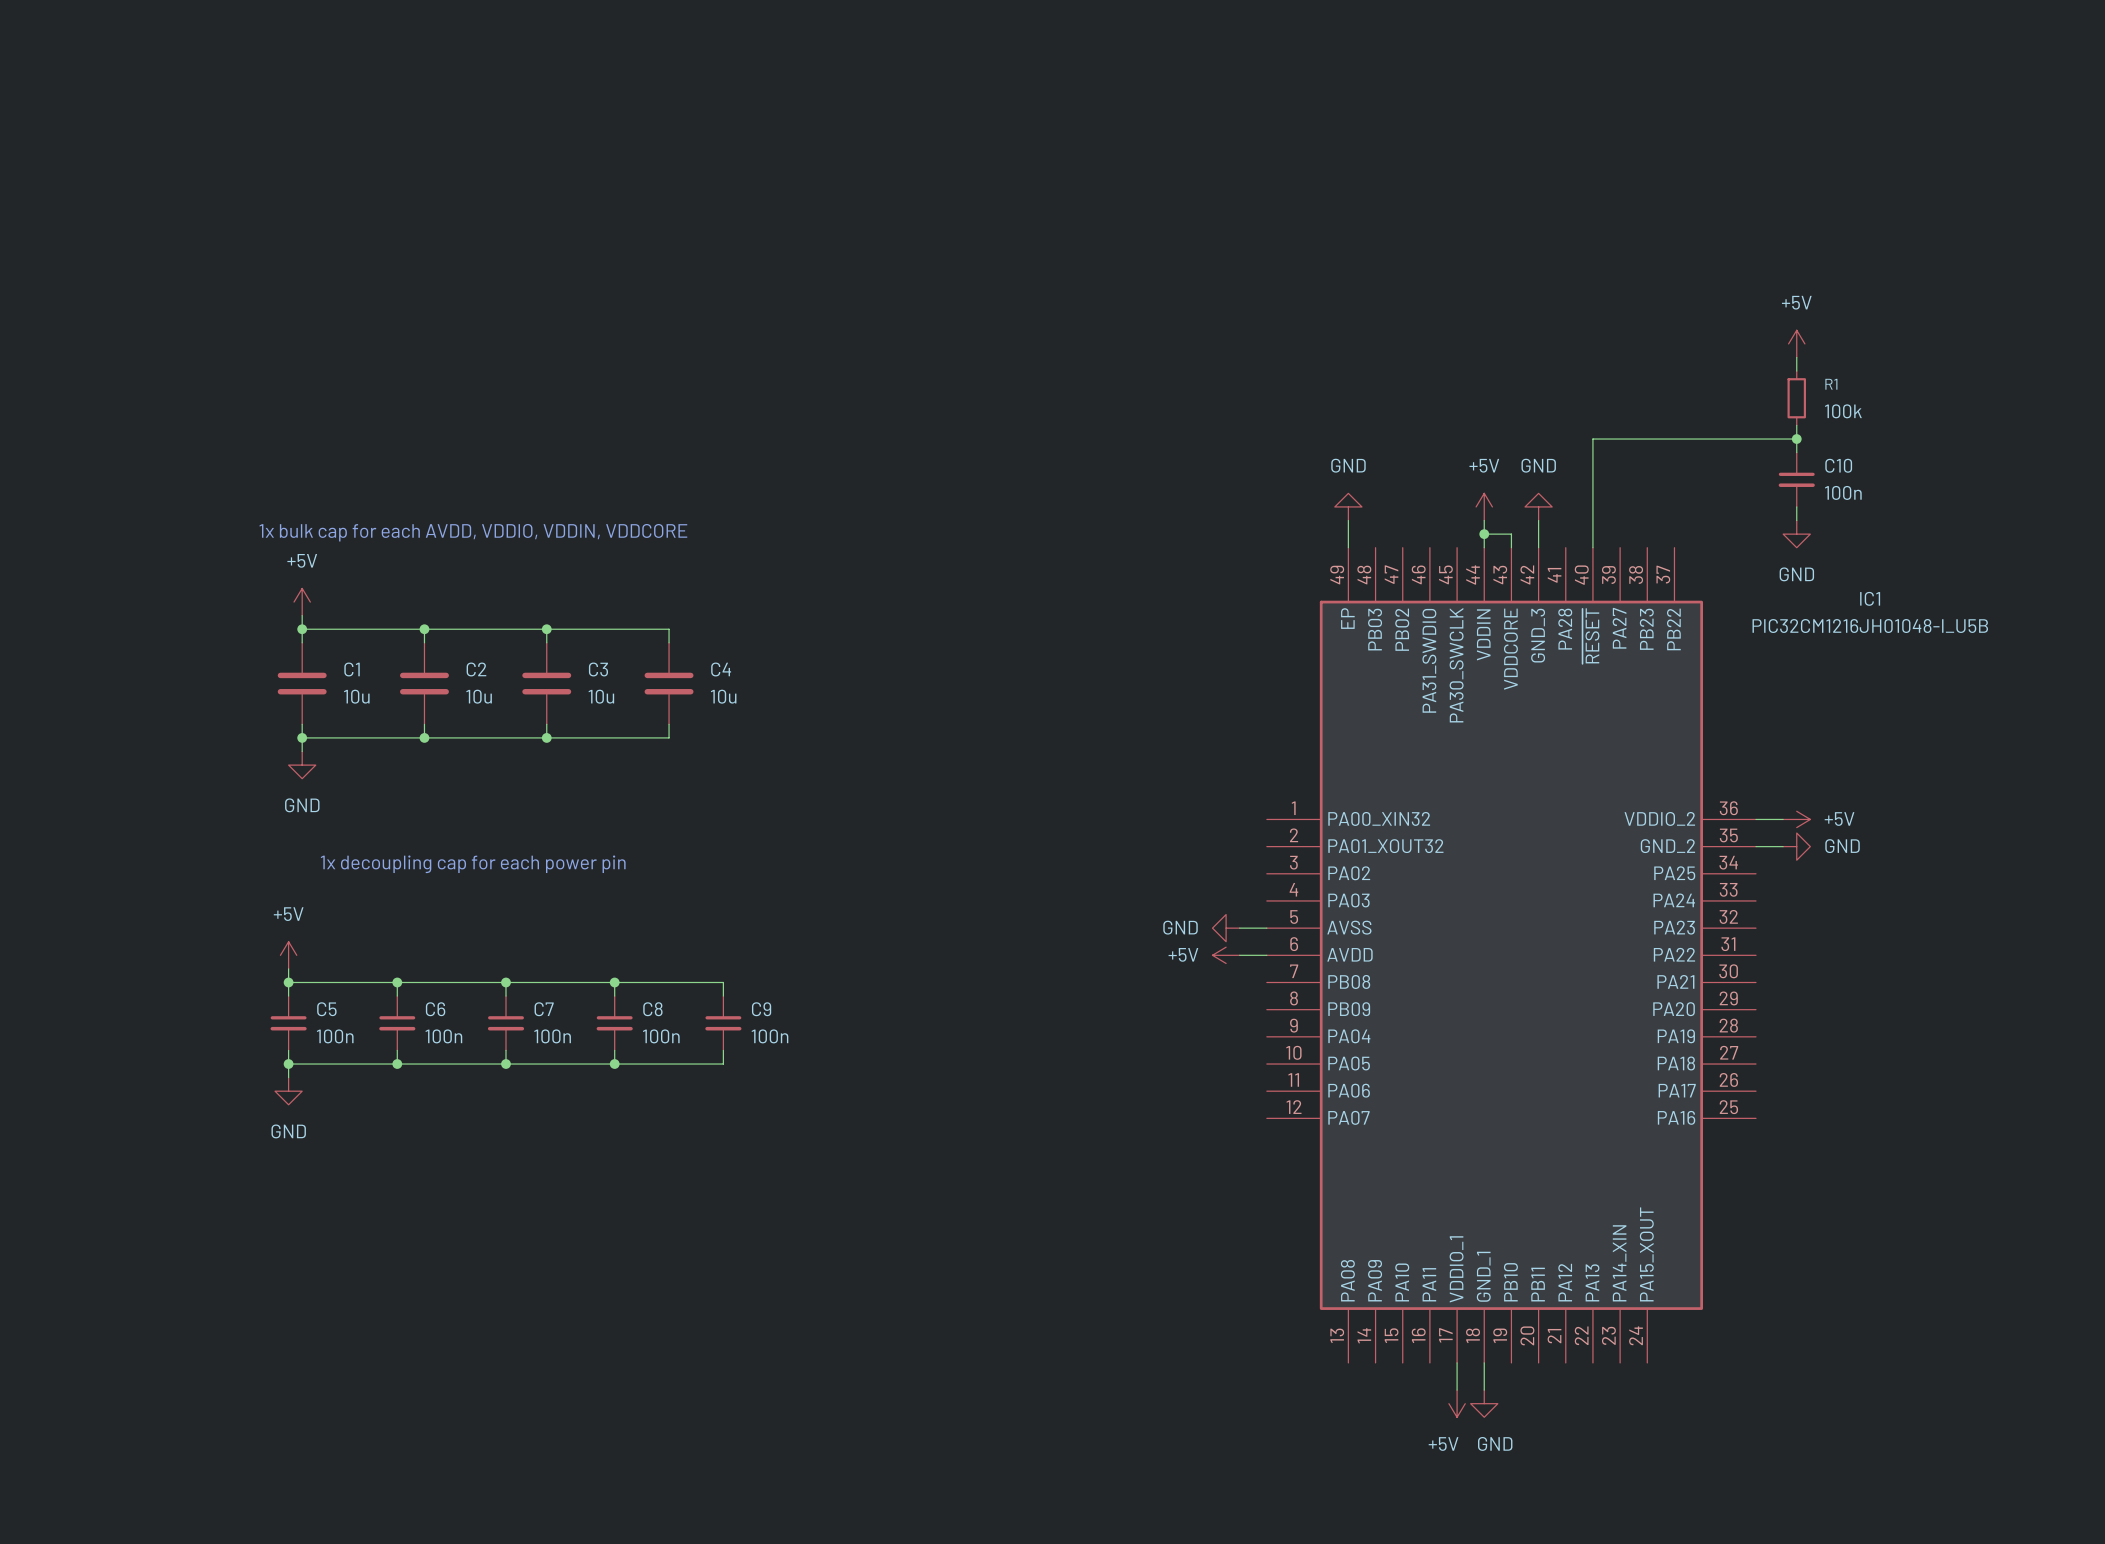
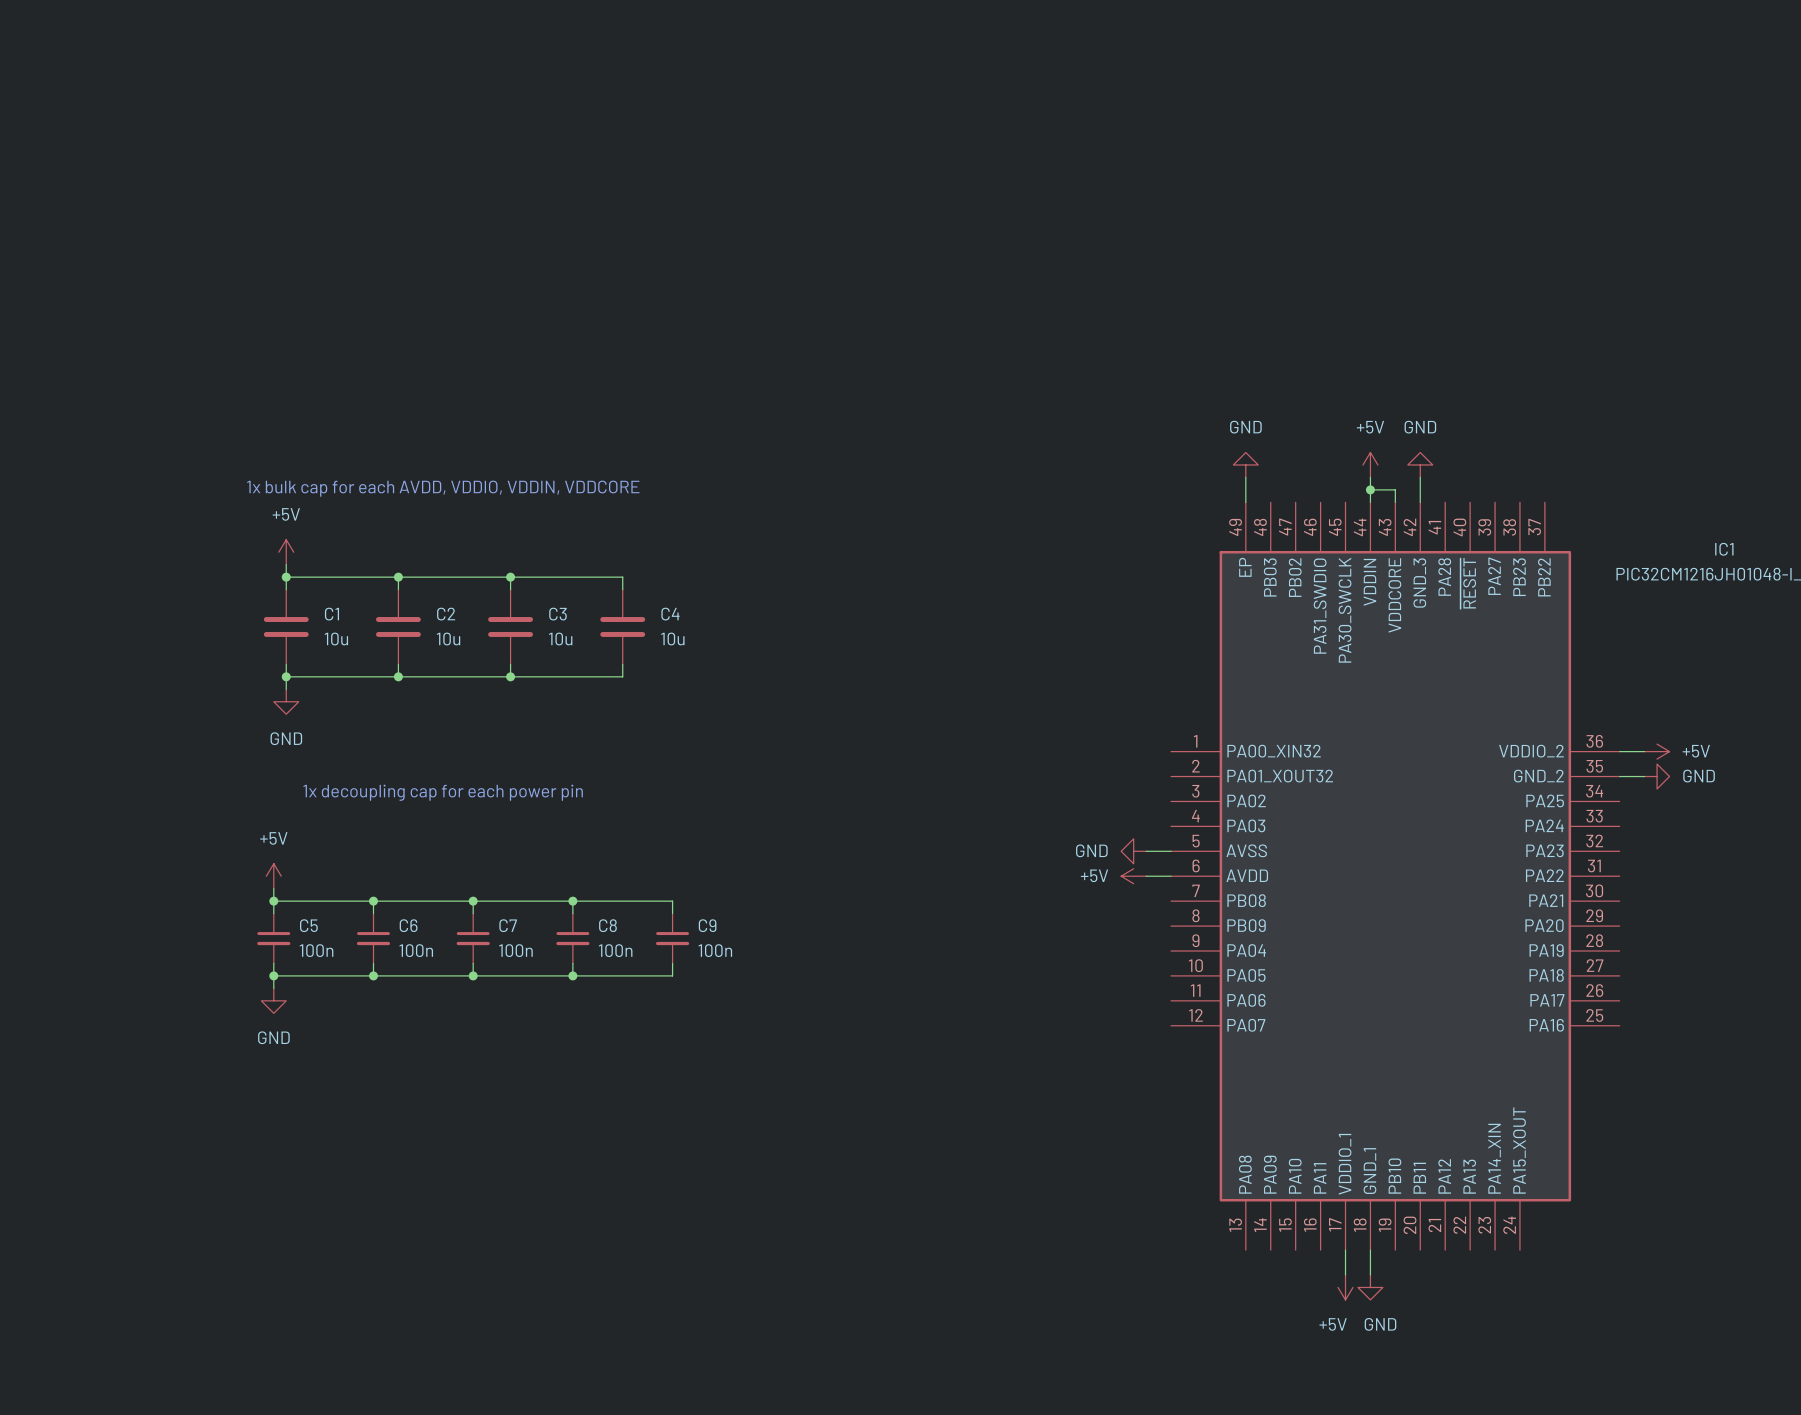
power symbol: +5V (1796, 343) -> none
wire: (1796, 357) (1796, 371) -> none
R1: 100k (1796, 398) -> none
wire: (1796, 425) (1796, 452) -> none
wire: (1796, 439) (1592, 439) (1592, 547) -> none
junction: (1796, 439) -> none
C10: 100n (1796, 479) -> none
wire: (1796, 506) (1796, 520) -> none
power symbol: GND (1796, 534) -> none

